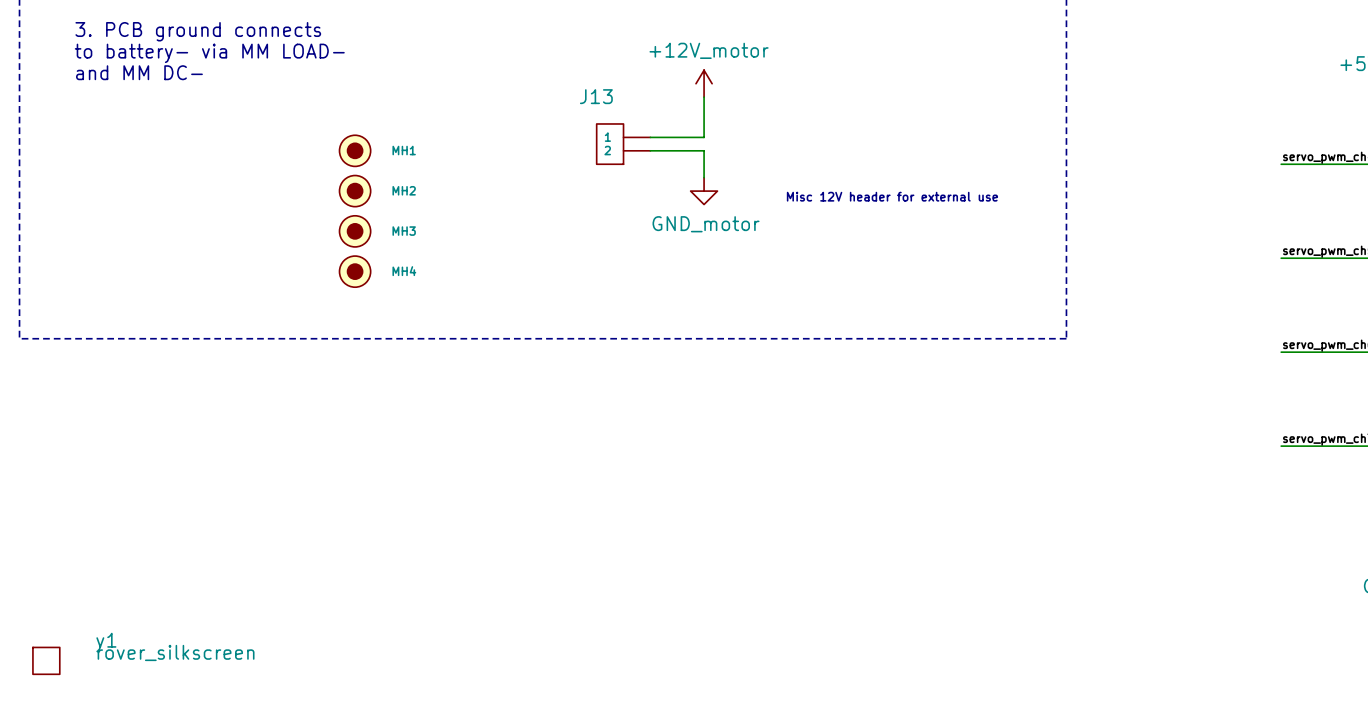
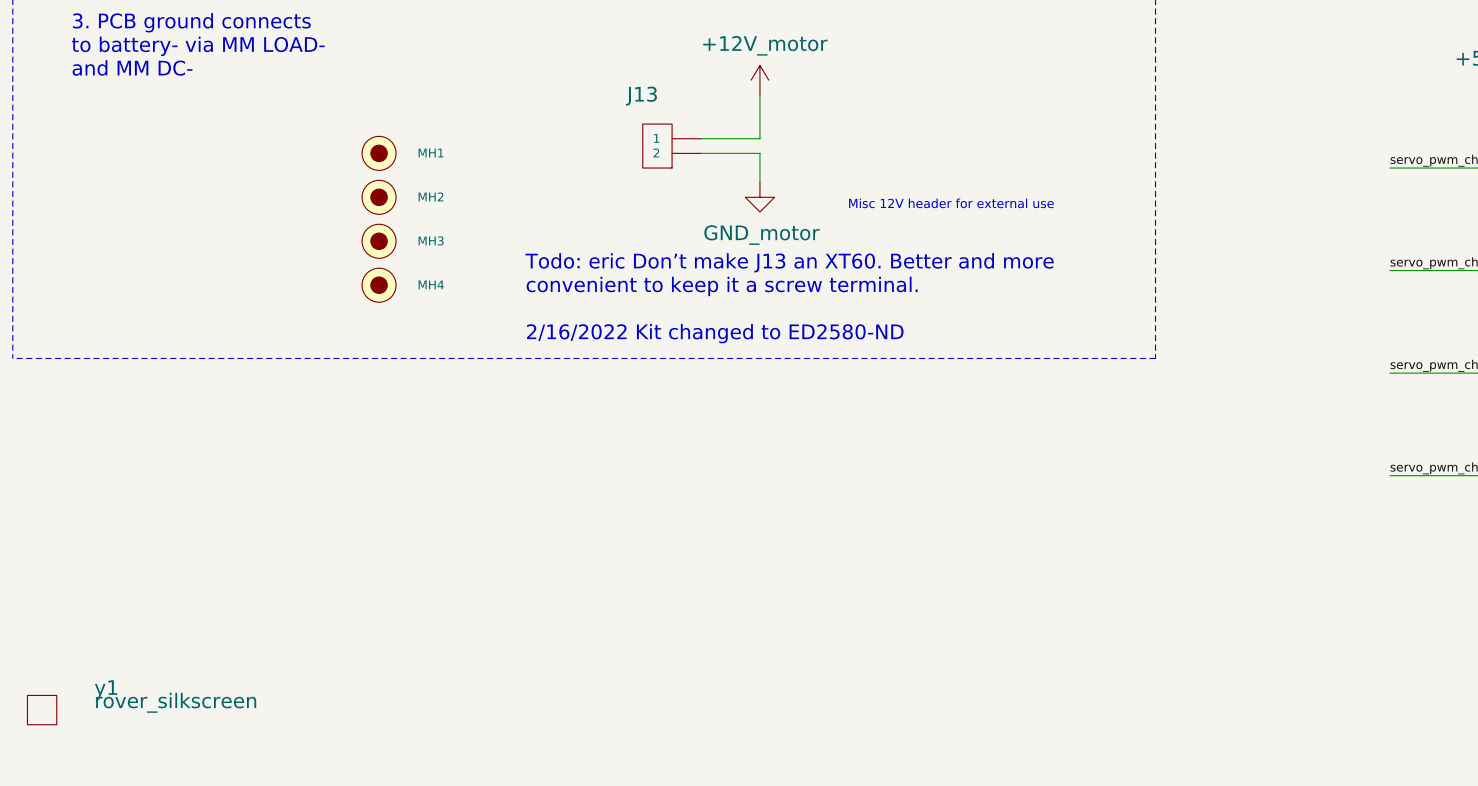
text: none -> Todo: eric Don’t make J13 an XT60. Better and more (789, 262)
text: none -> convenient to keep it a screw terminal. (722, 286)
text: none -> 2/16/2022 Kit changed to ED2580-ND (715, 333)

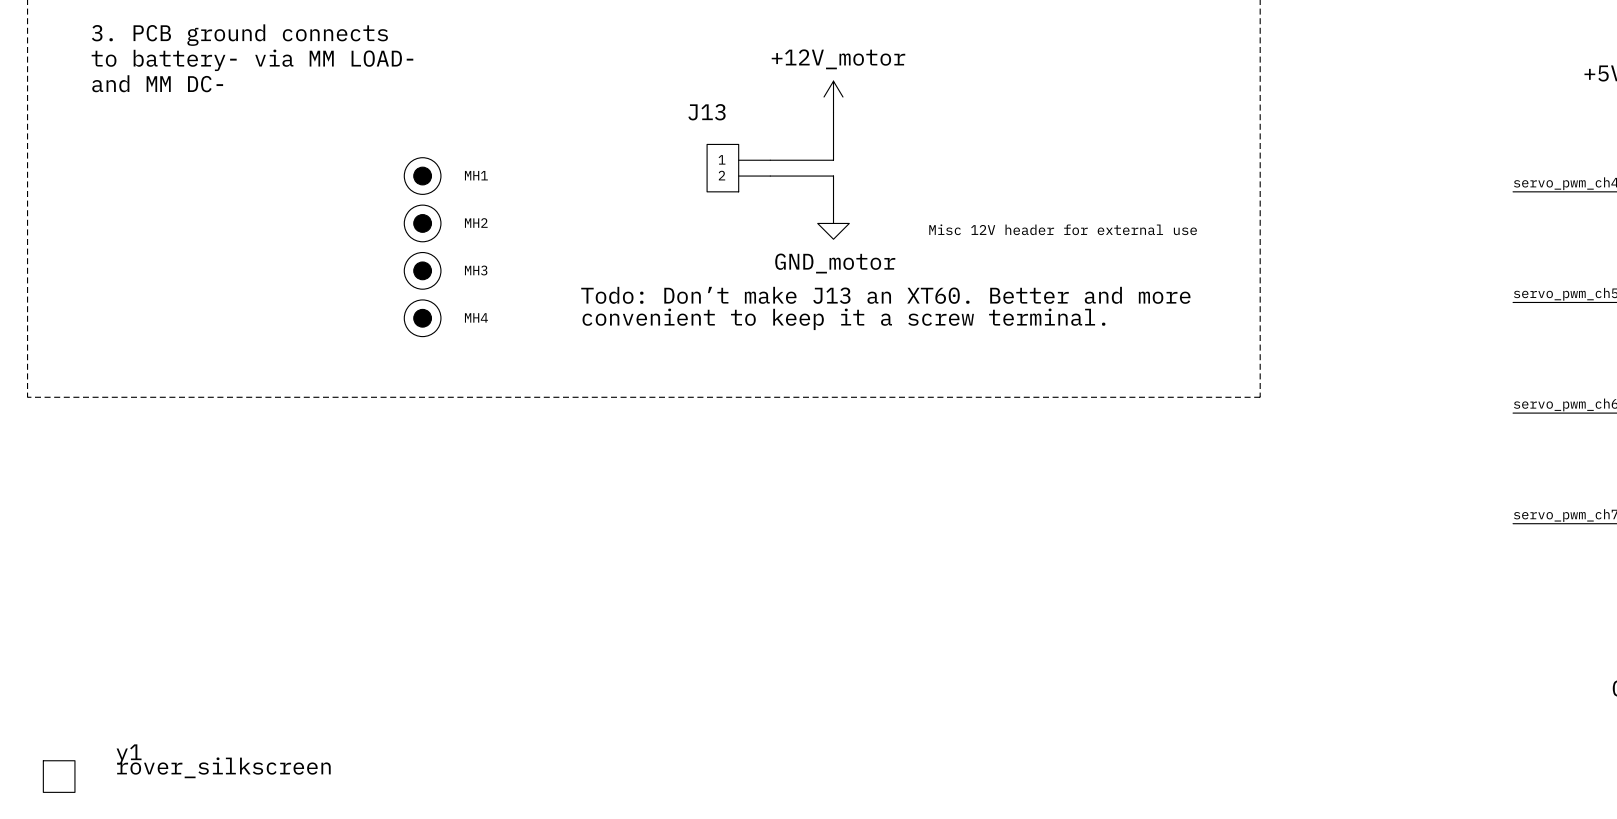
text: Todo: eric Don’t make J13 an XT60. Better and more (789, 262) -> Todo: Don’t make J13 an XT60. Better and more (885, 295)
text: 2/16/2022 Kit changed to ED2580-ND (715, 333) -> none

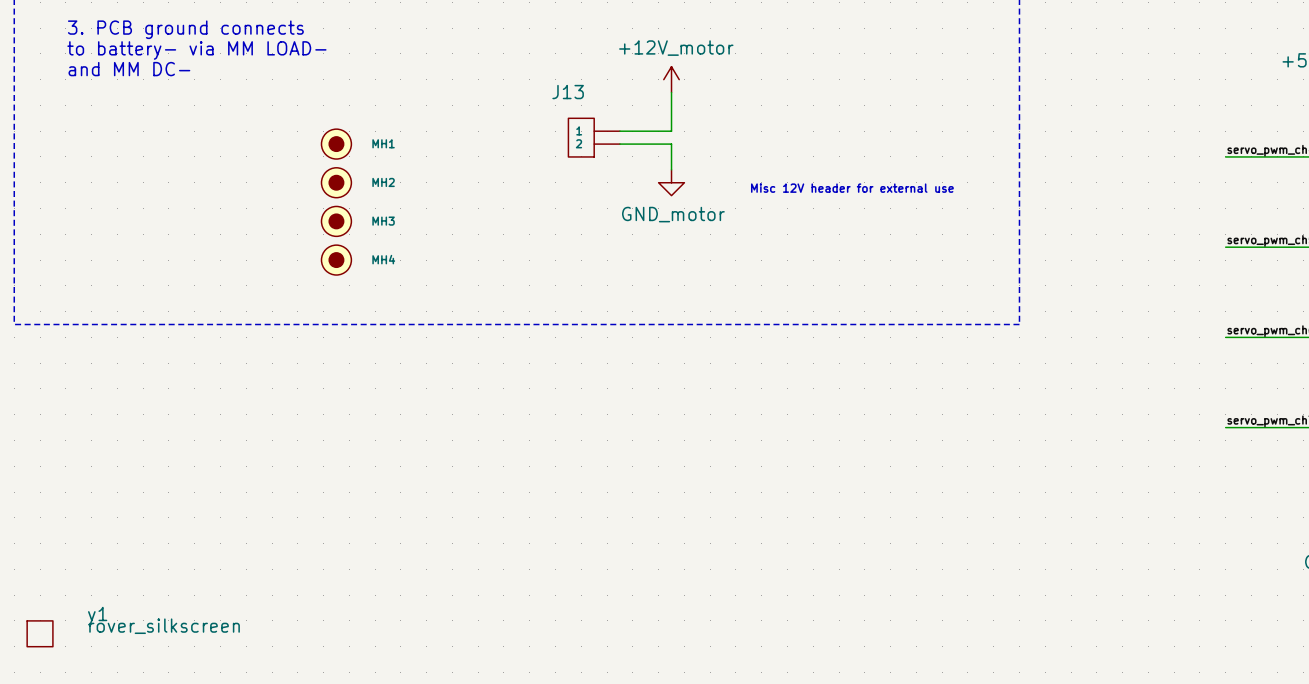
text: Todo: Don’t make J13 an XT60. Better and more (885, 295) -> none
text: convenient to keep it a screw terminal. (843, 319) -> none

